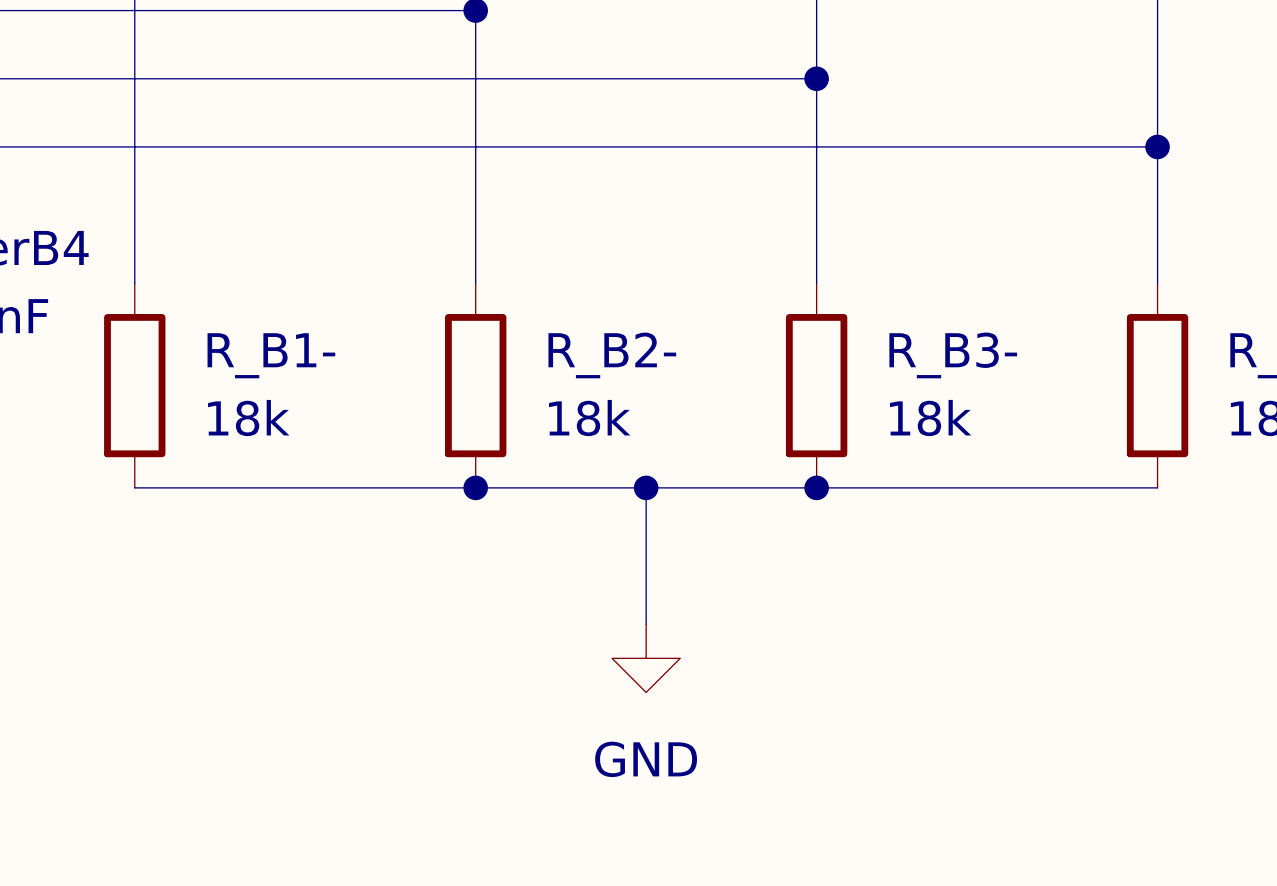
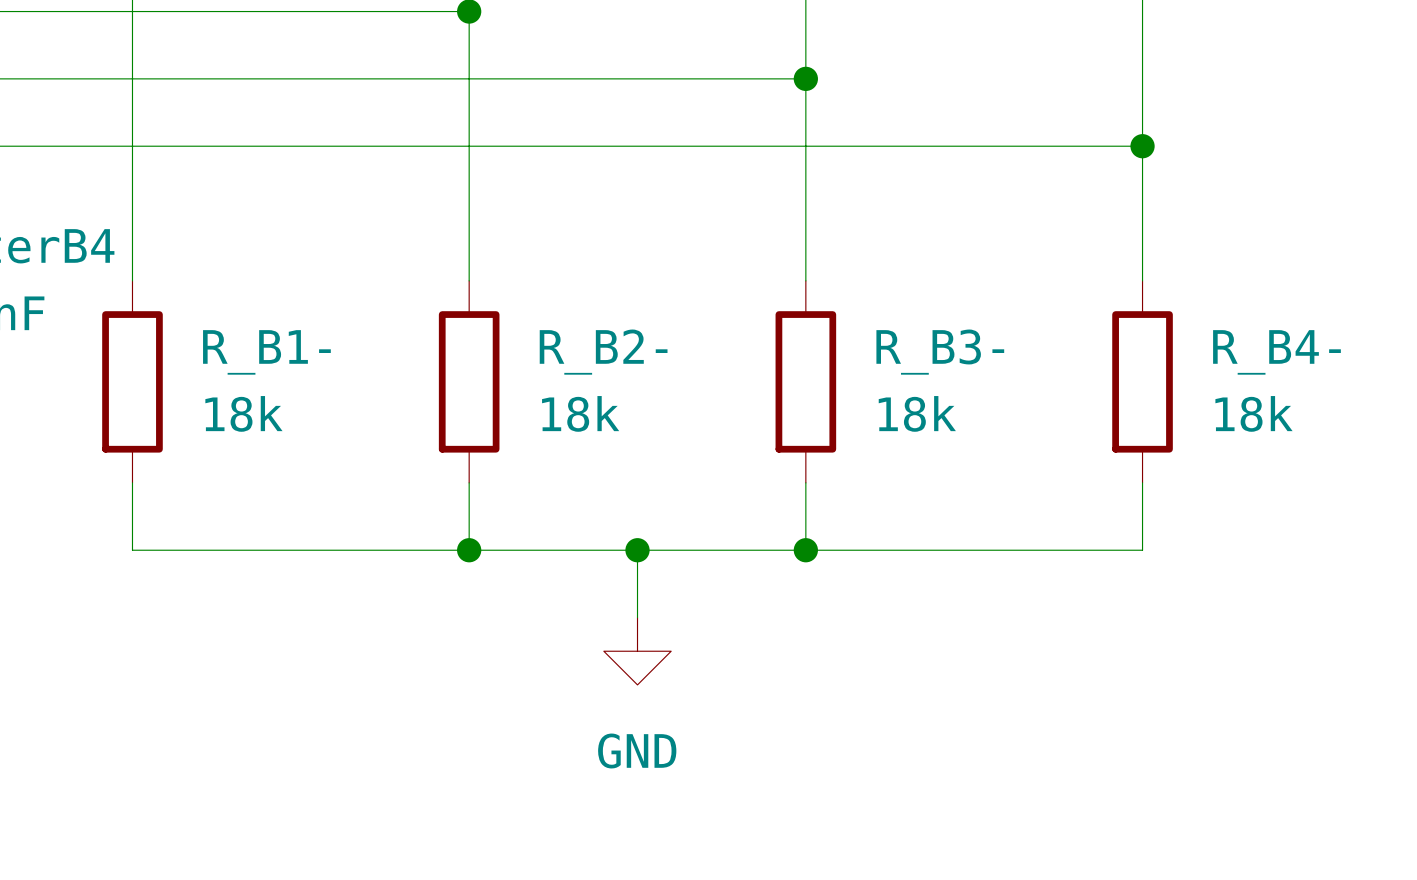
wire: (134, 487) (1157, 487) -> (132, 482) (132, 550) (1142, 550) (1142, 482)
wire: none -> (469, 482) (469, 550)
junction position: (475, 487) -> (469, 550)
wire: (646, 487) (646, 556) -> (805, 482) (805, 550)
junction position: (646, 487) -> (637, 550)
junction position: (816, 487) -> (805, 550)

